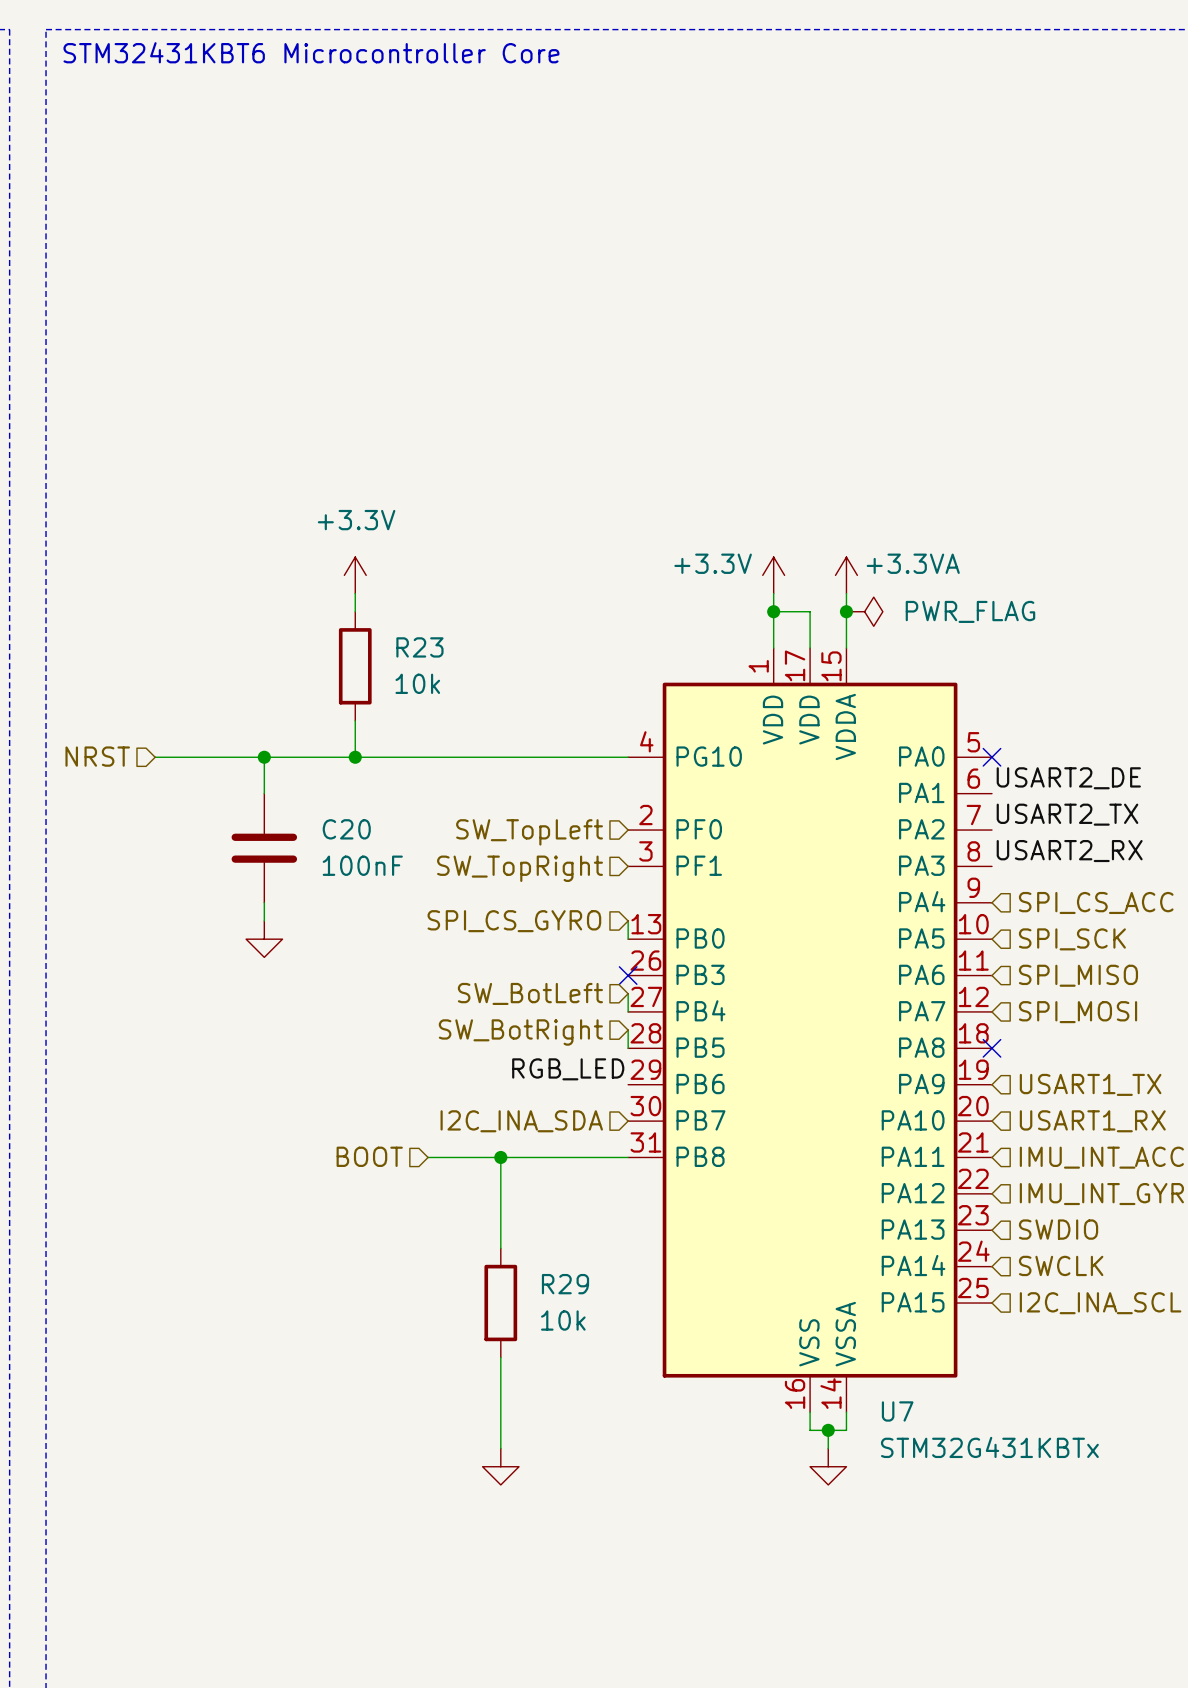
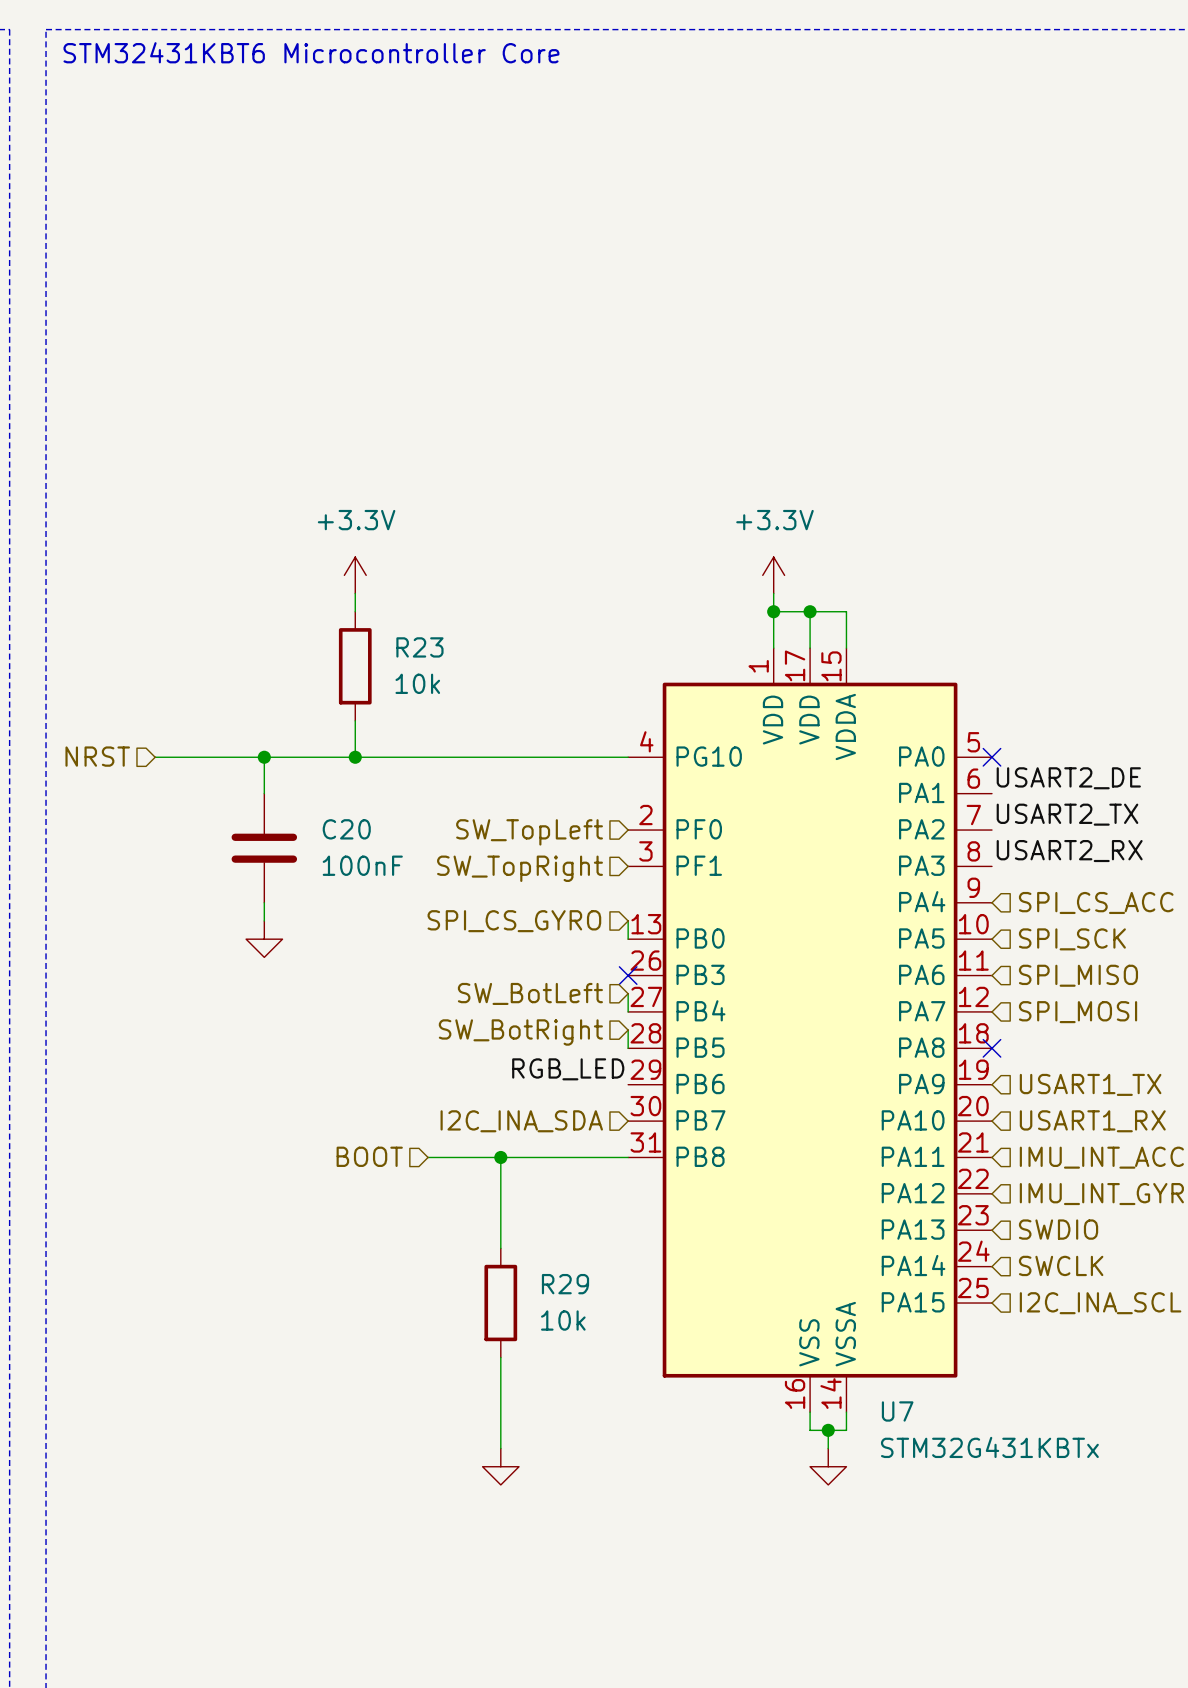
power symbol text position: +3.3V (713, 563) -> +3.3V (774, 520)
power symbol: +3.3VA (846, 575) -> none
wire: (846, 593) (846, 611) -> (810, 611) (846, 611)
junction position: (846, 611) -> (810, 611)
power symbol: PWR_FLAG (864, 611) -> none

